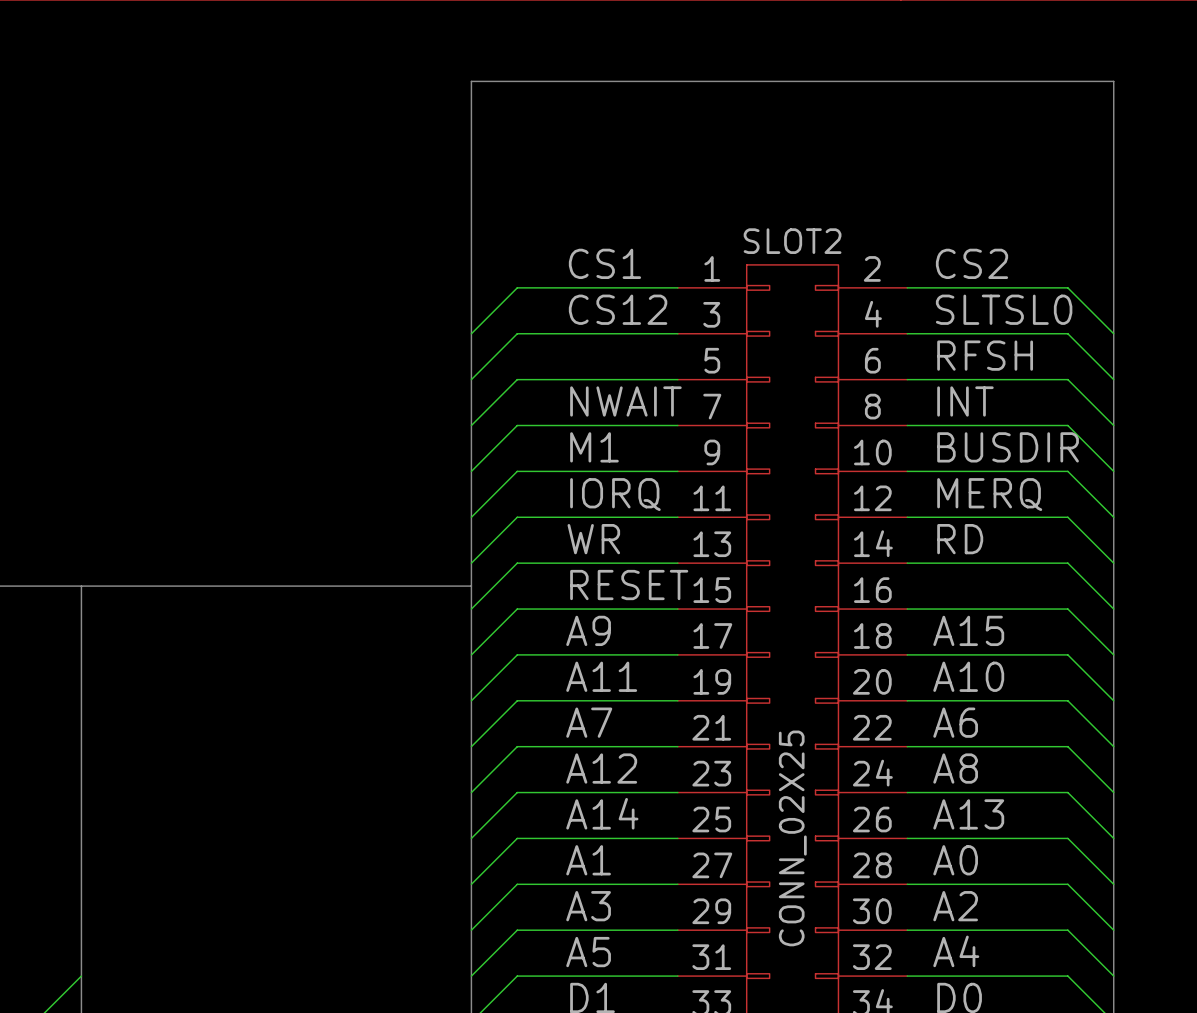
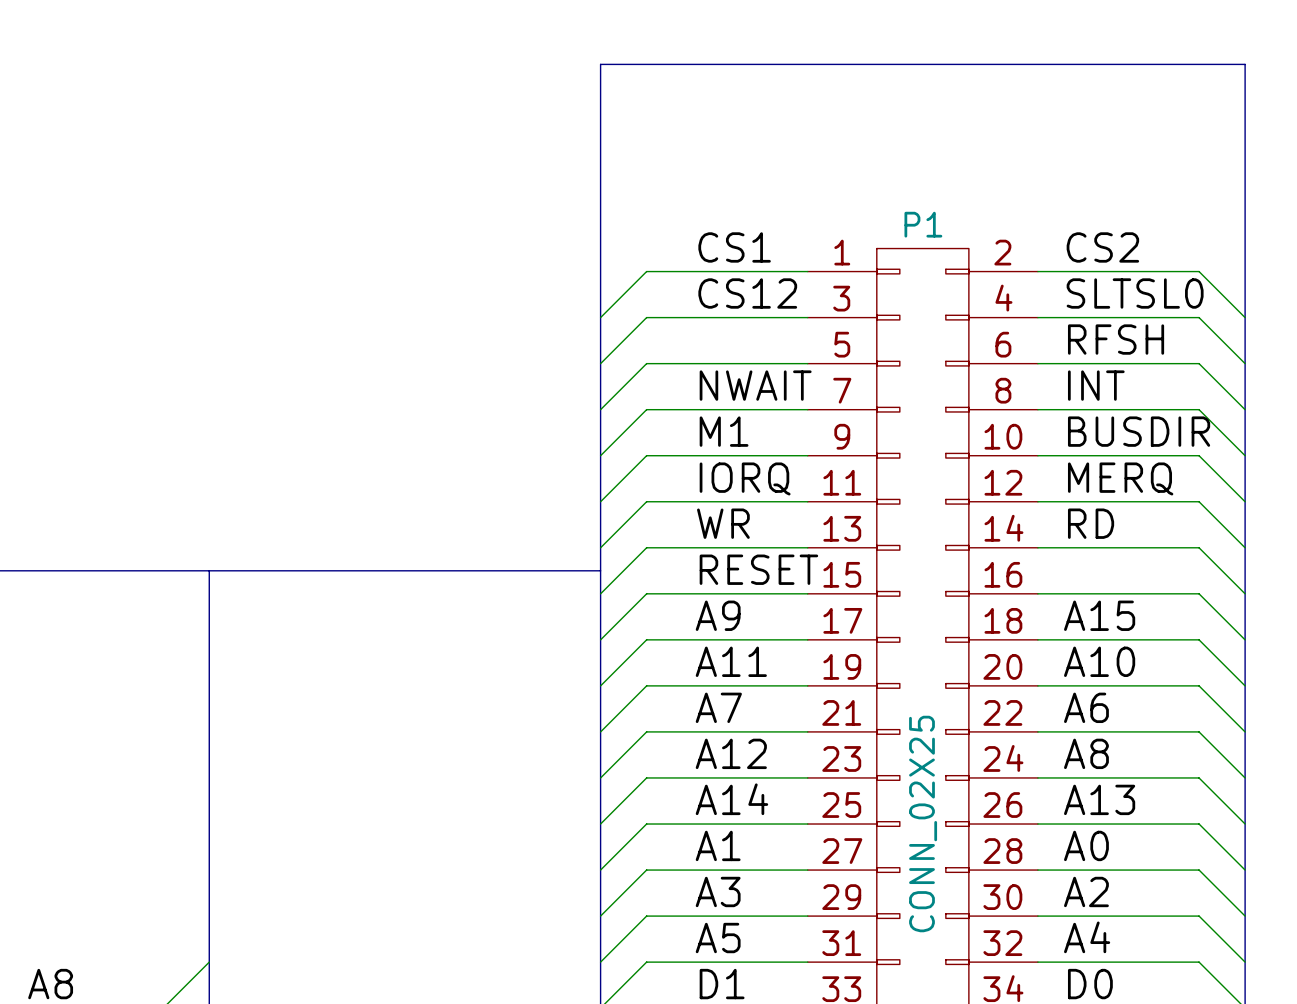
SLOT2 name: SLOT2 (792, 241) -> P1 (923, 224)

